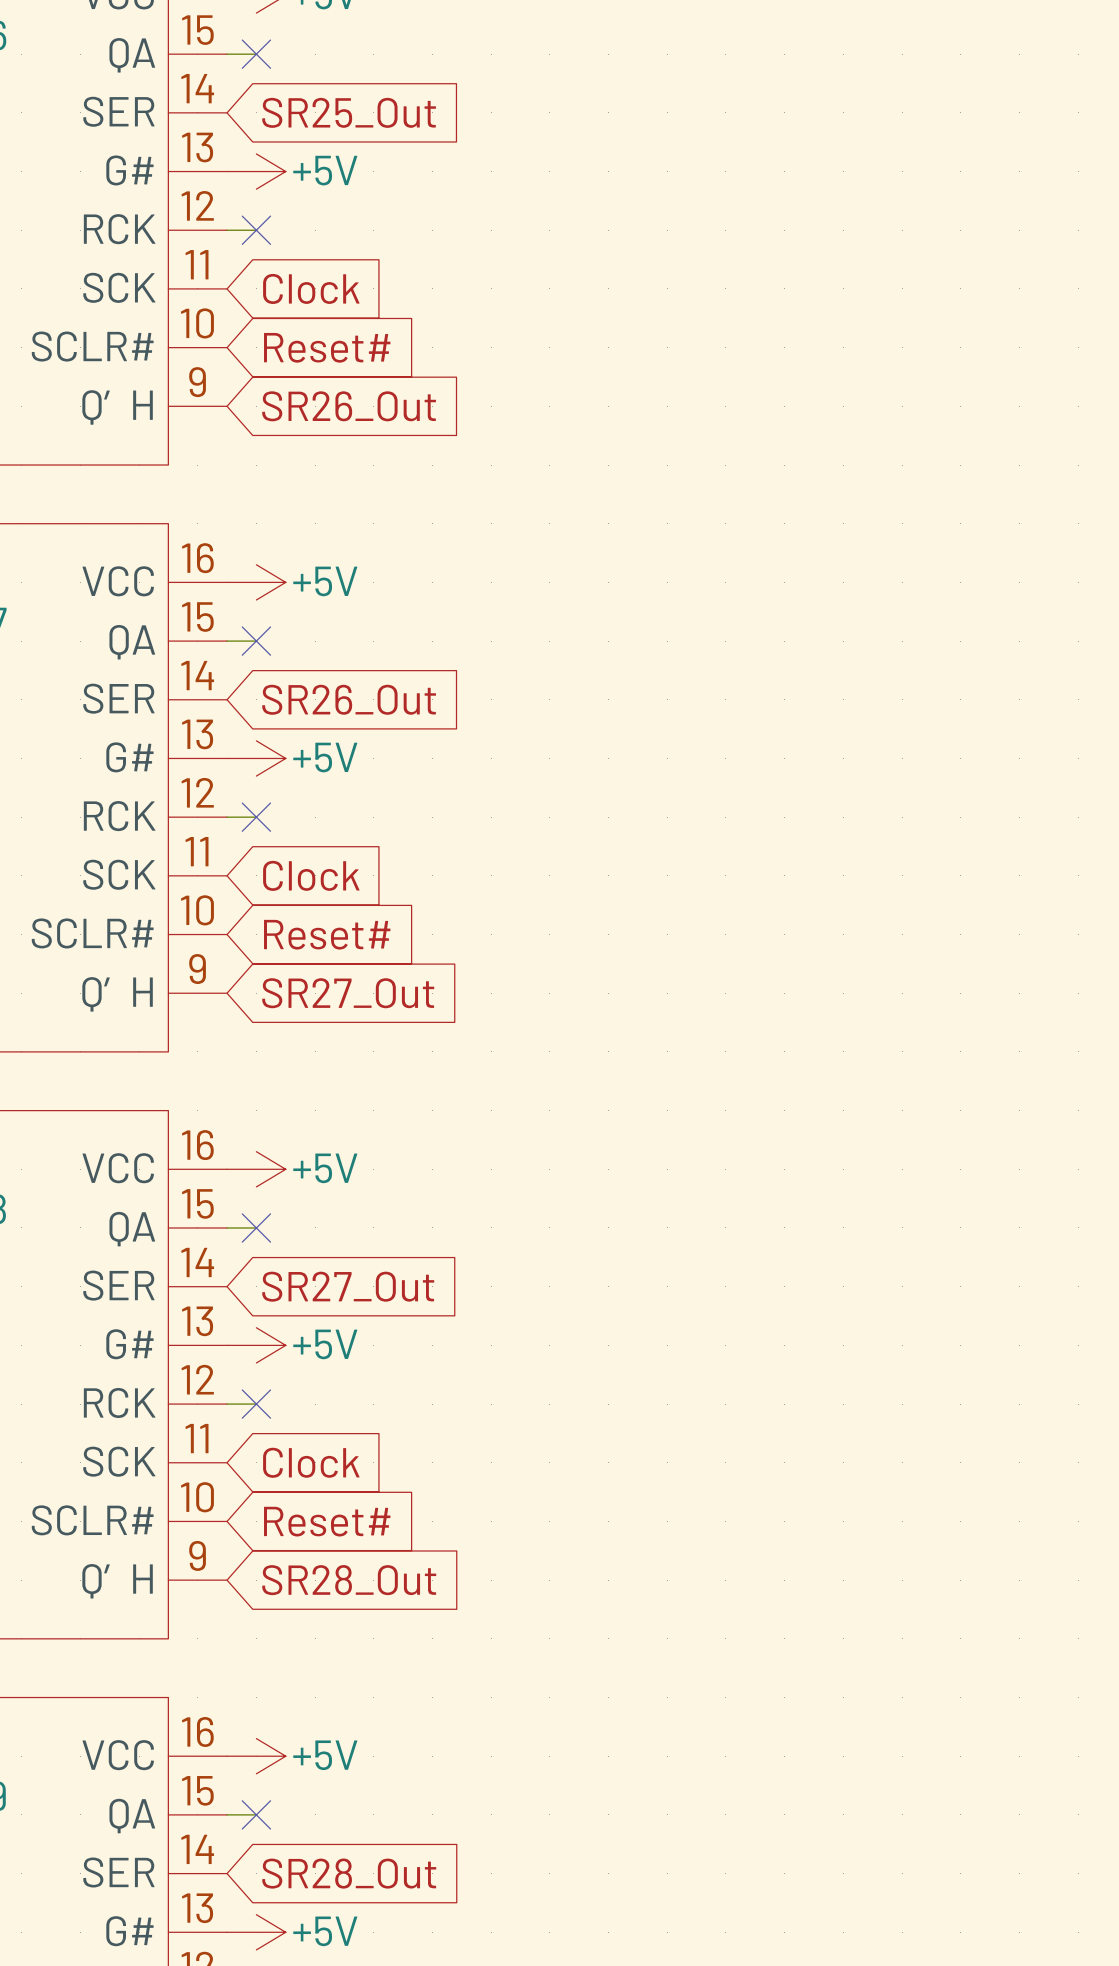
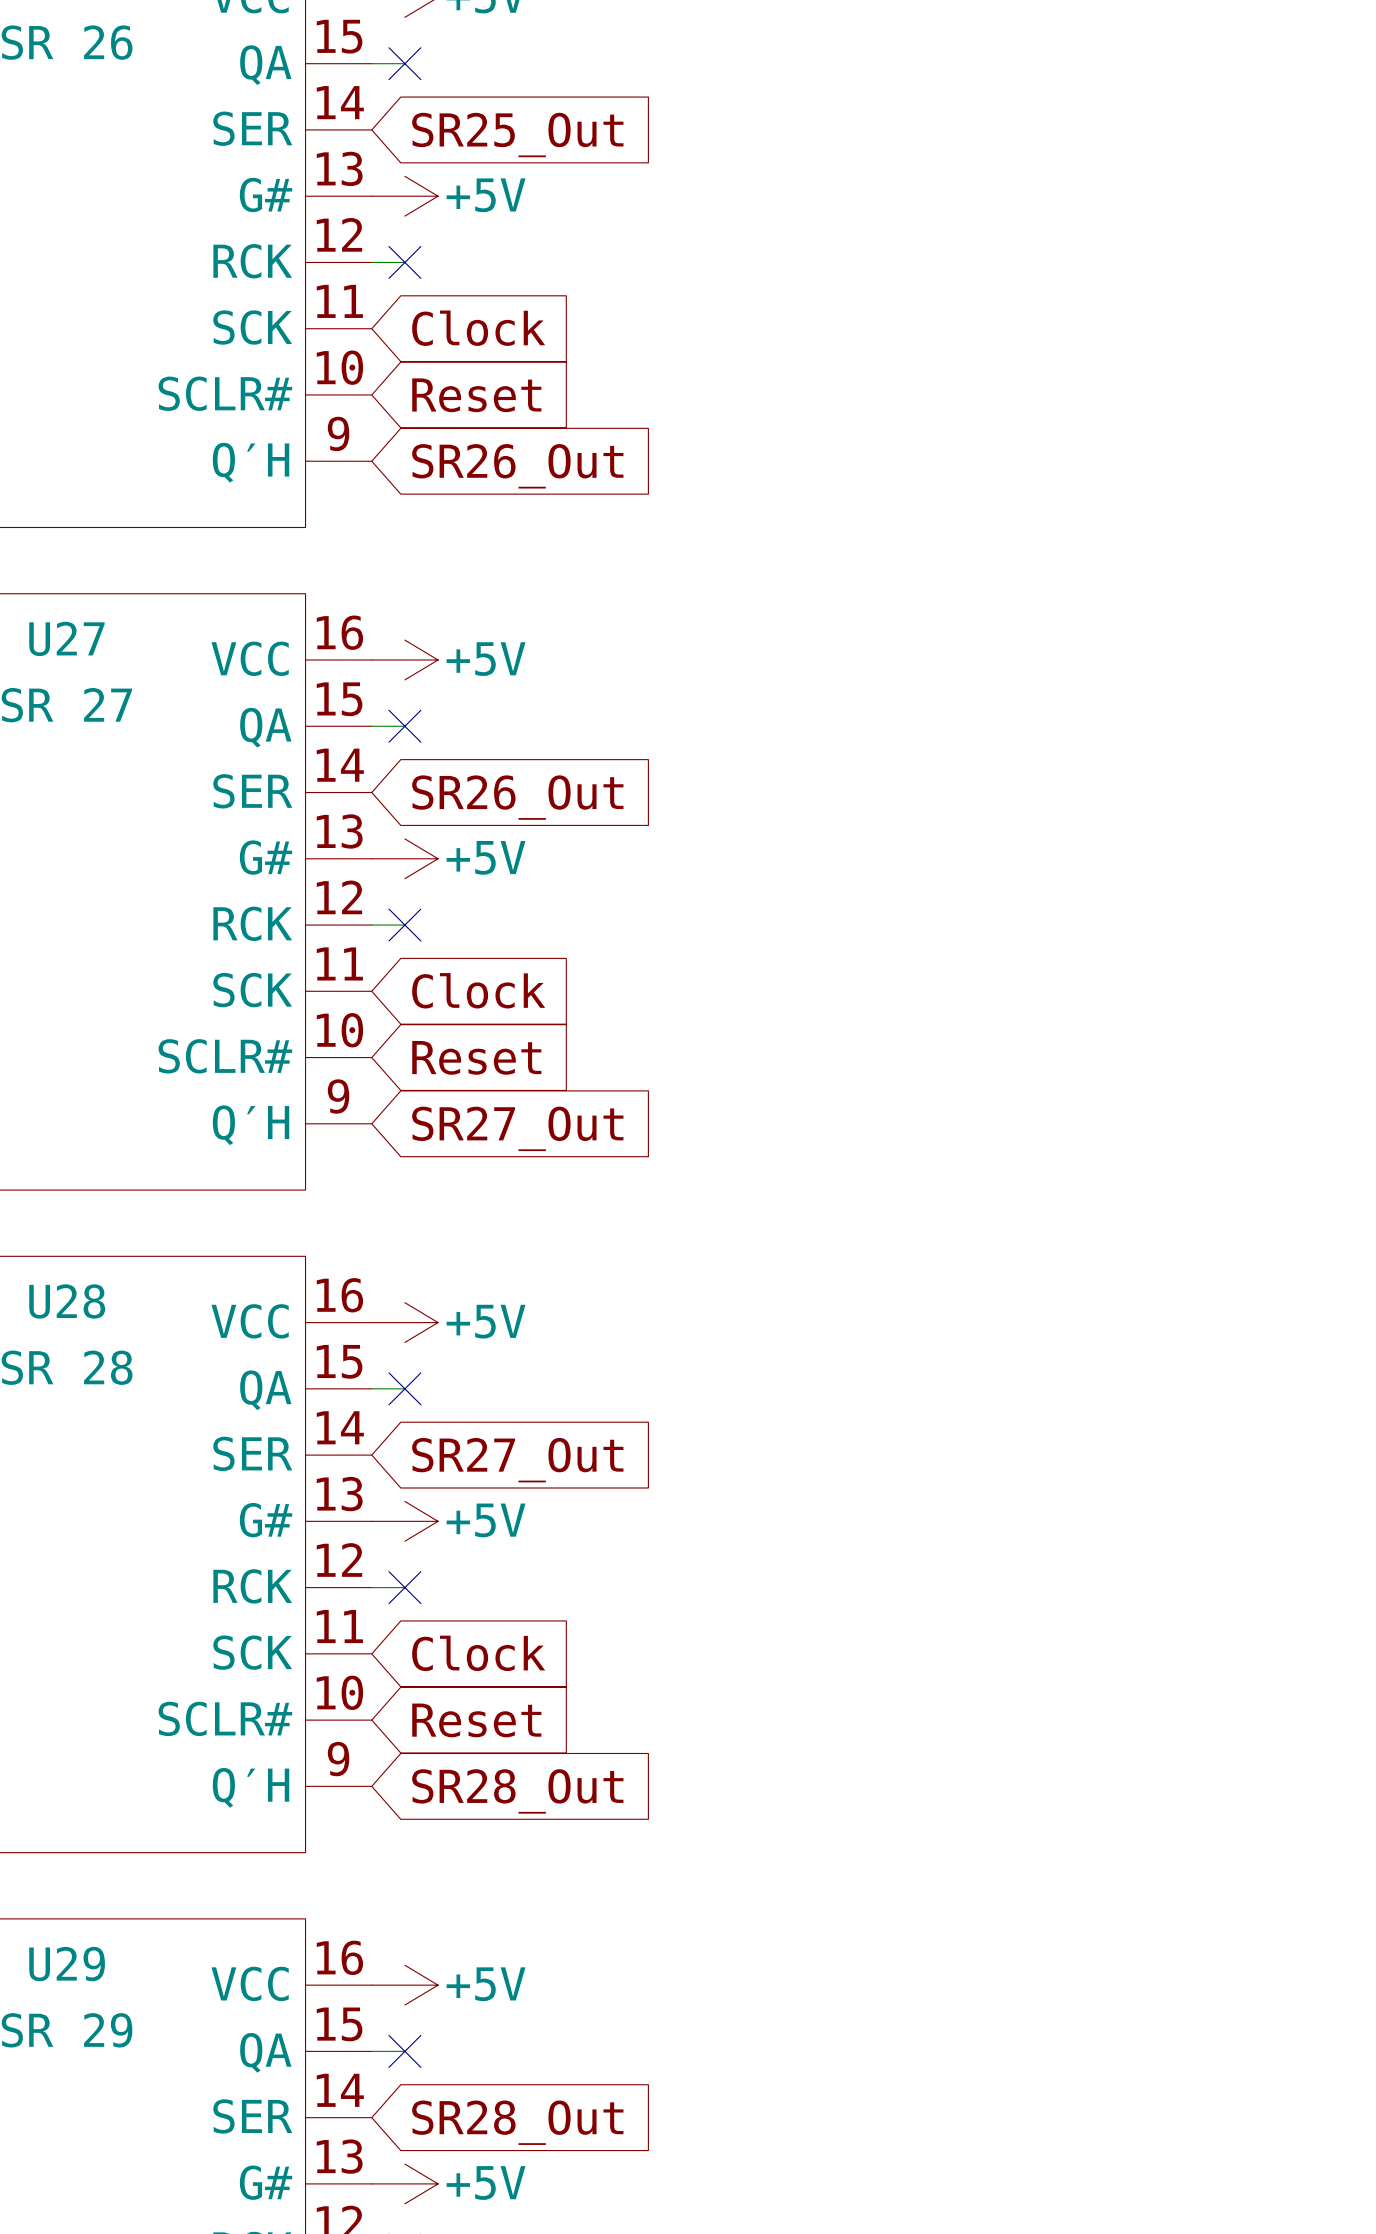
global label: Reset# (327, 347) -> Reset (476, 395)
global label: Reset# (327, 934) -> Reset (476, 1057)
global label: Reset# (327, 1521) -> Reset (476, 1720)

